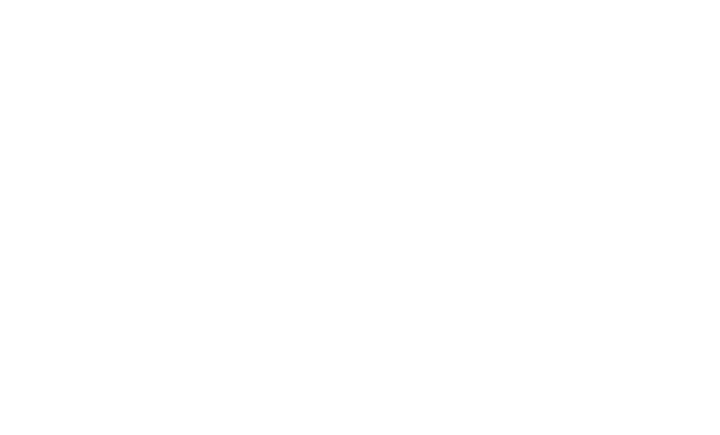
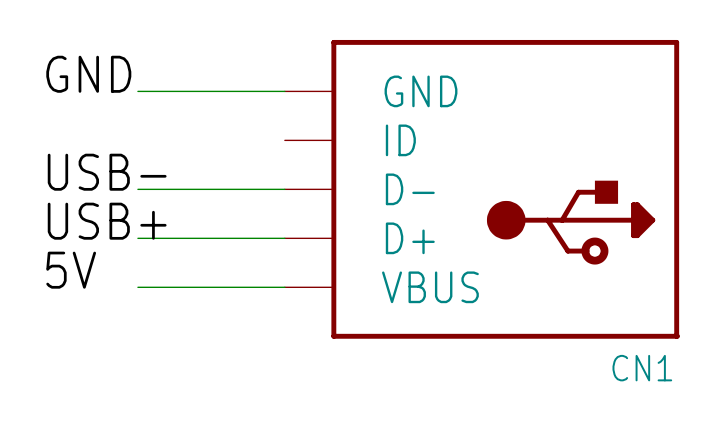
label: none -> GND (88, 74)
wire: none -> (137, 91) (284, 91)
label: none -> USB- (107, 172)
wire: none -> (137, 189) (284, 189)
CN1: none -> (482, 189)
label: none -> USB+ (107, 221)
wire: none -> (137, 238) (284, 238)
label: none -> 5V (71, 270)
wire: none -> (137, 287) (284, 287)

